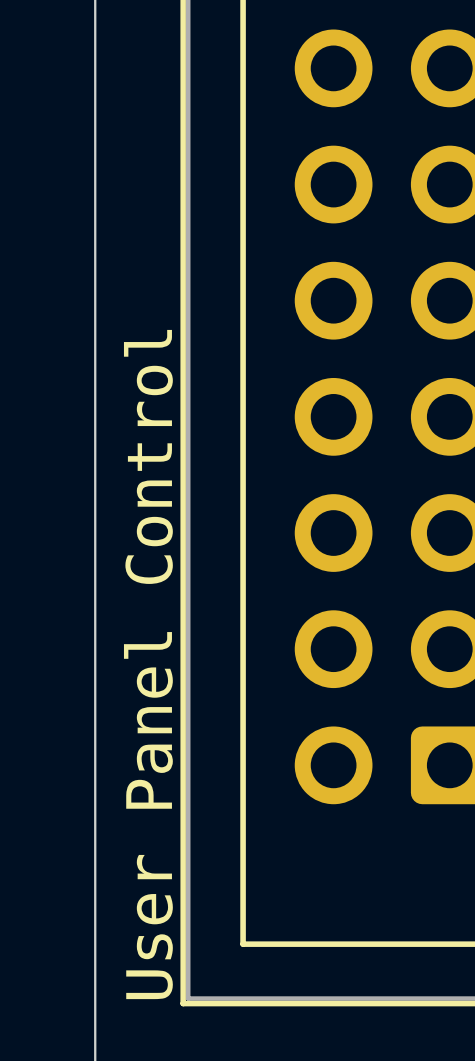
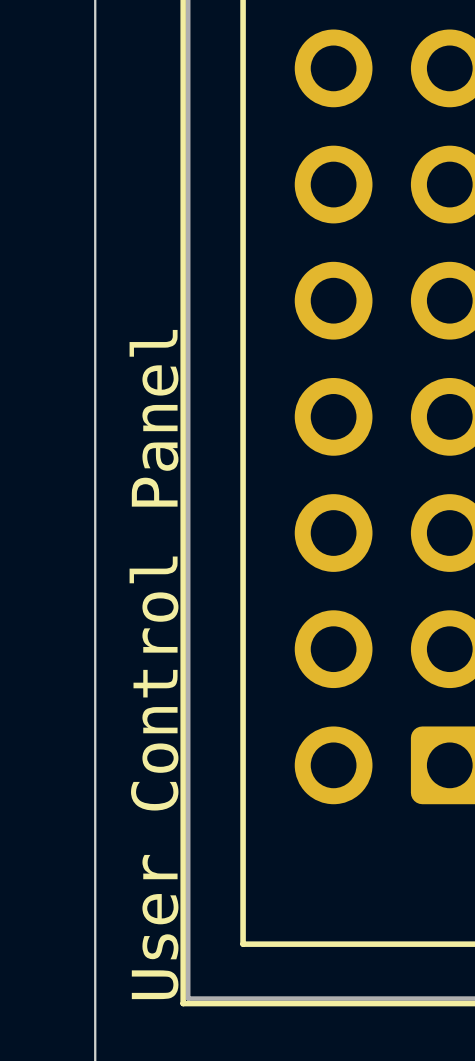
text: User Panel Control (148, 664) -> User Control Panel (154, 664)

